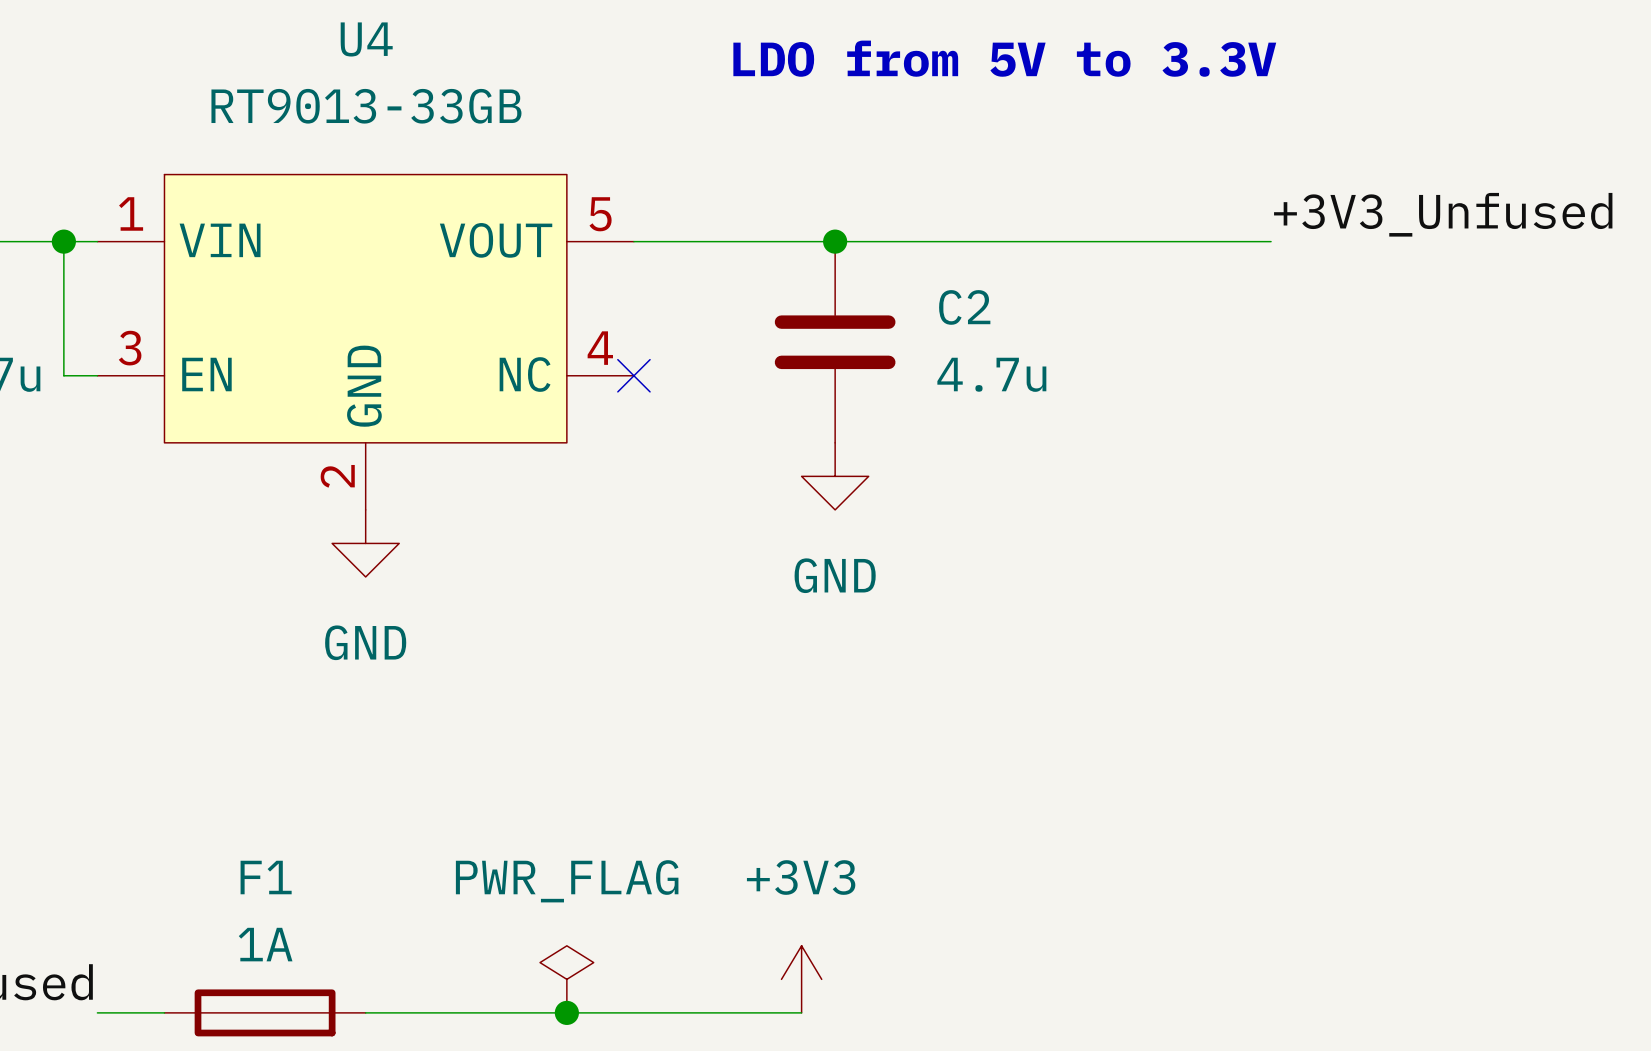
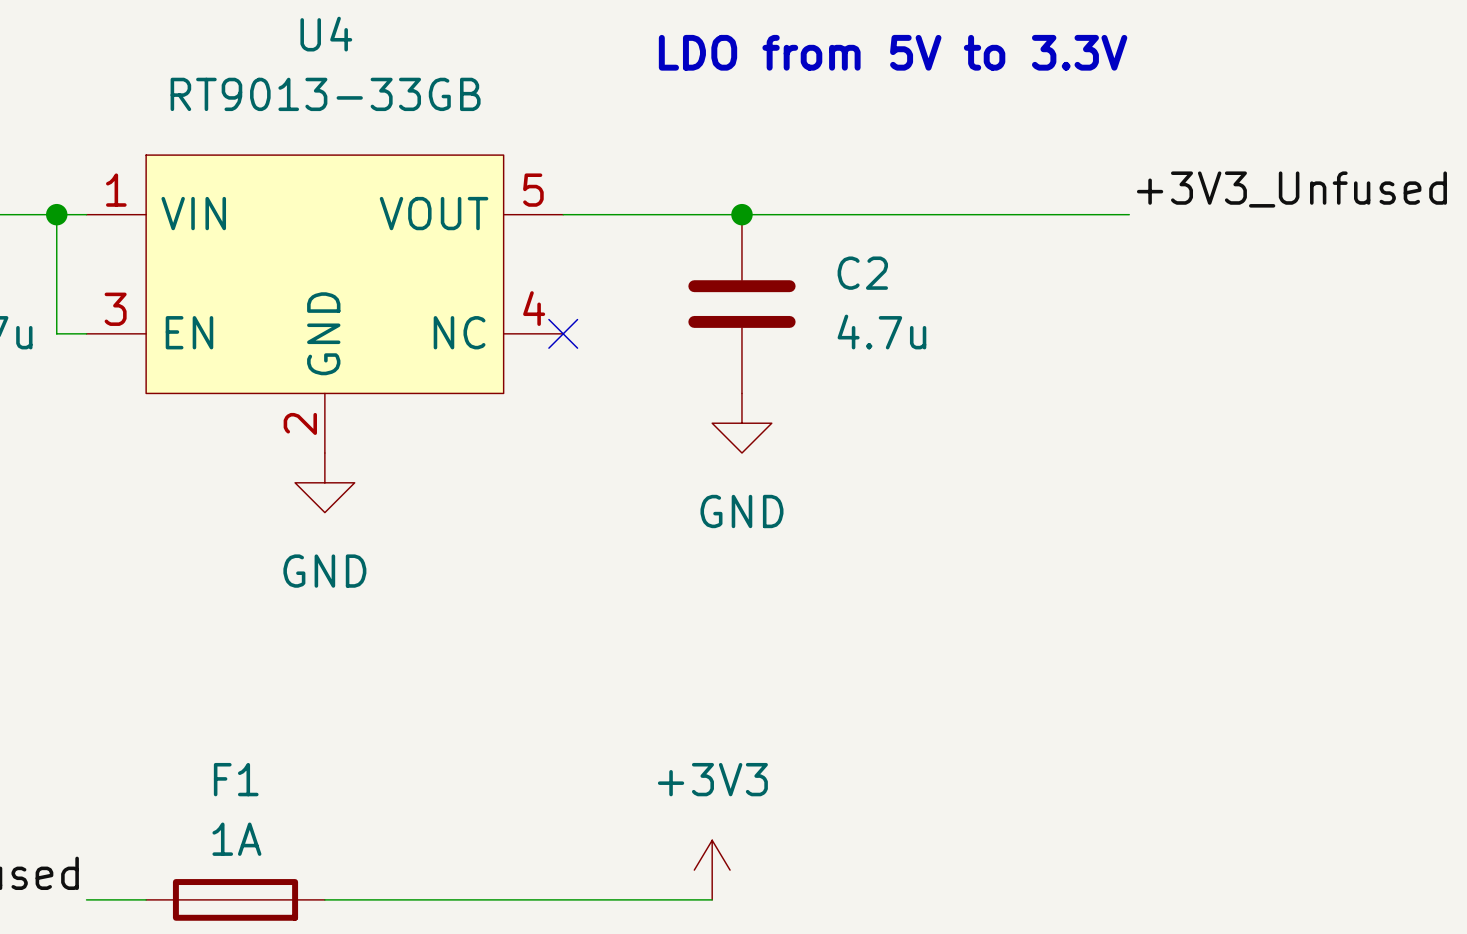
power symbol: PWR_FLAG (566, 979) -> none
junction: (566, 1012) -> none

